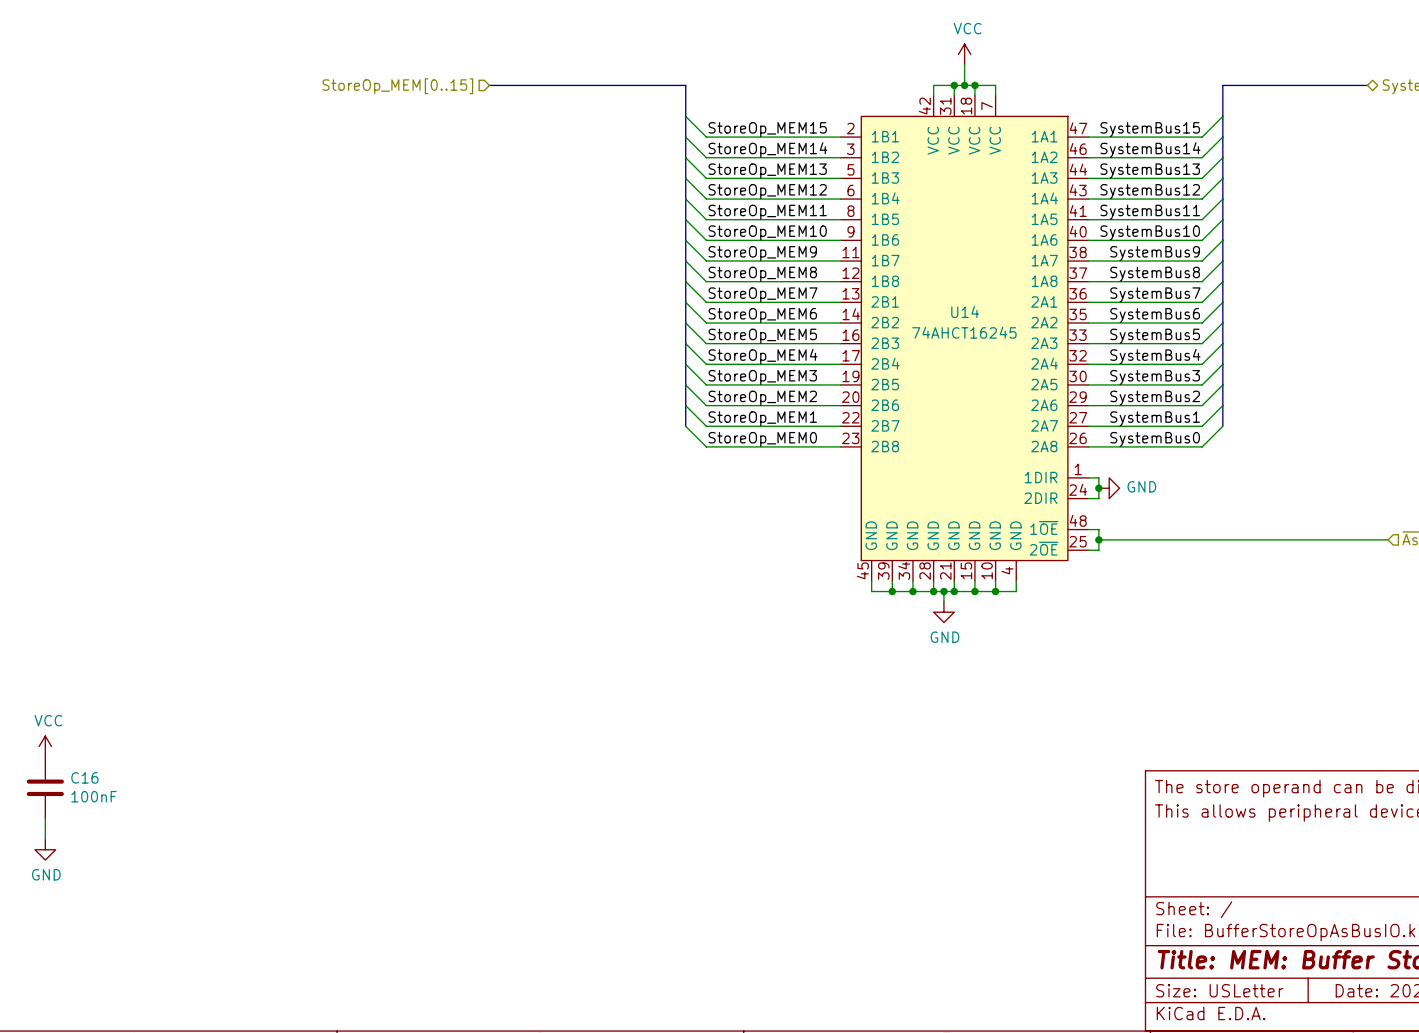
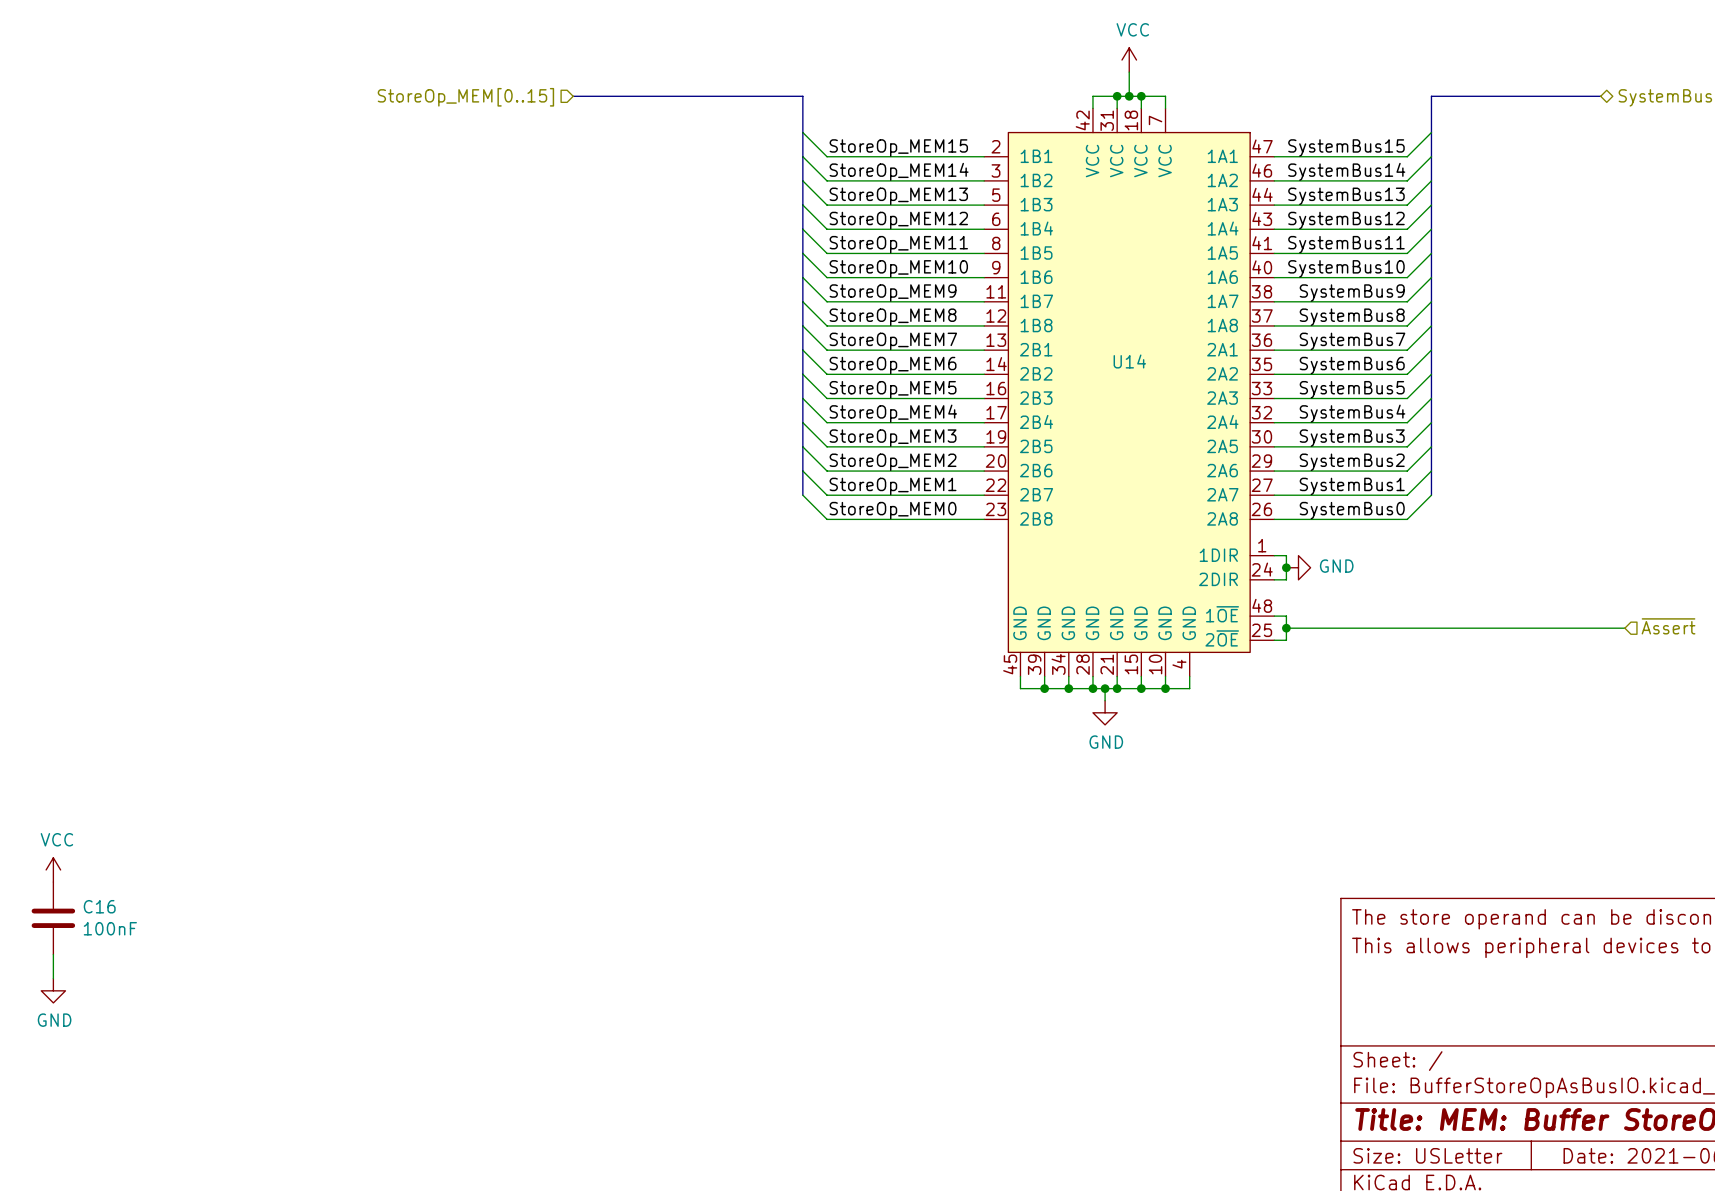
U14 value: 74AHCT16245 (964, 332) -> none

